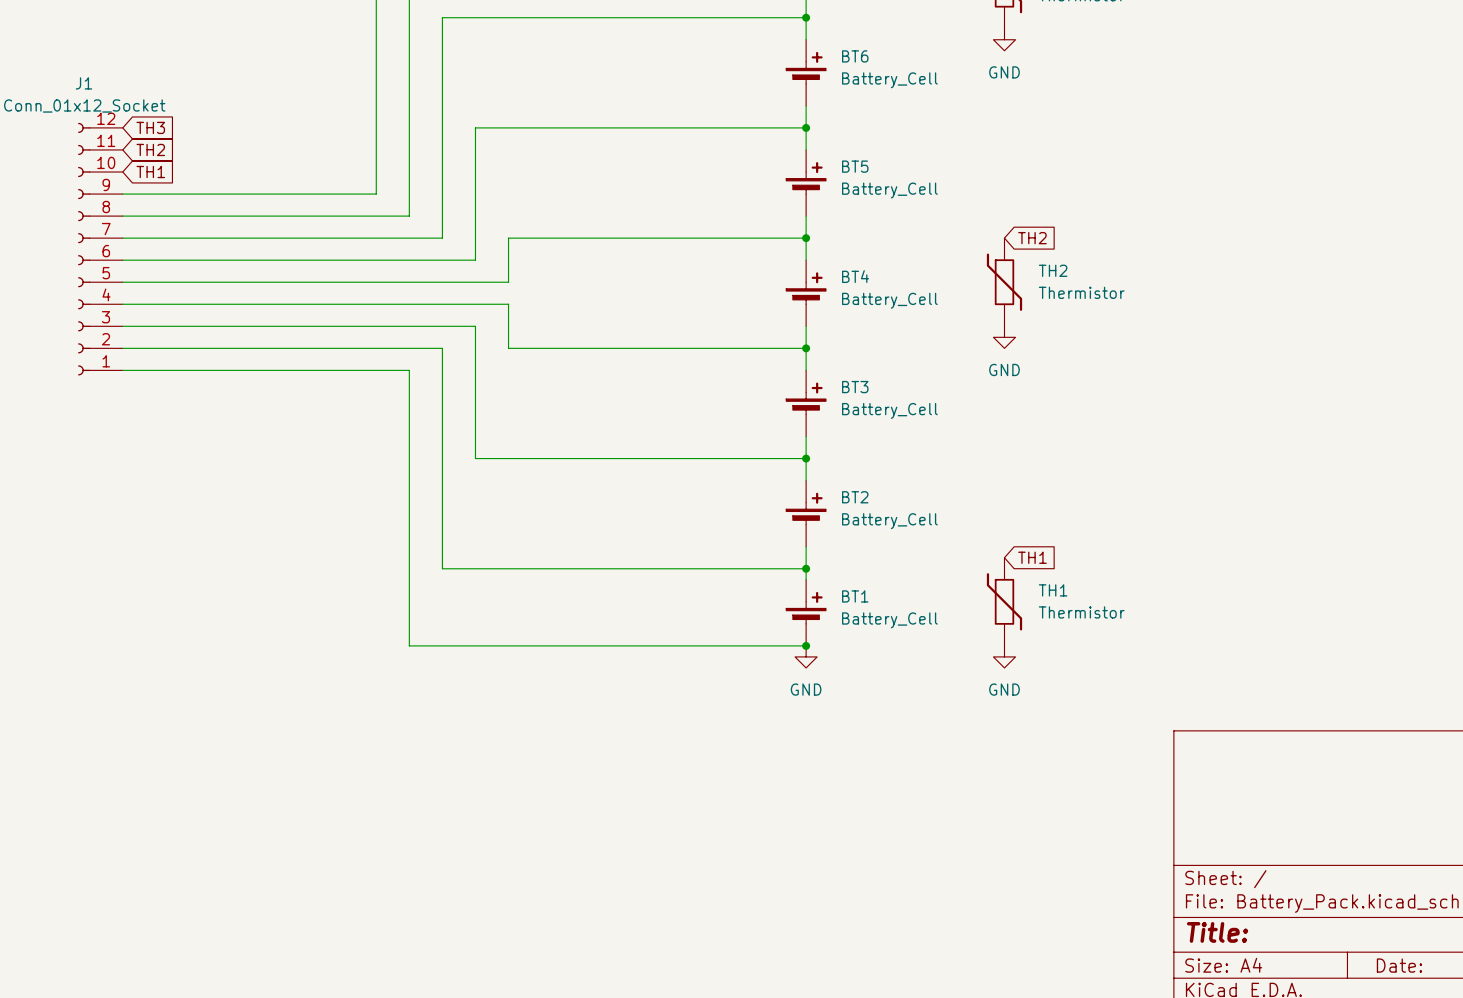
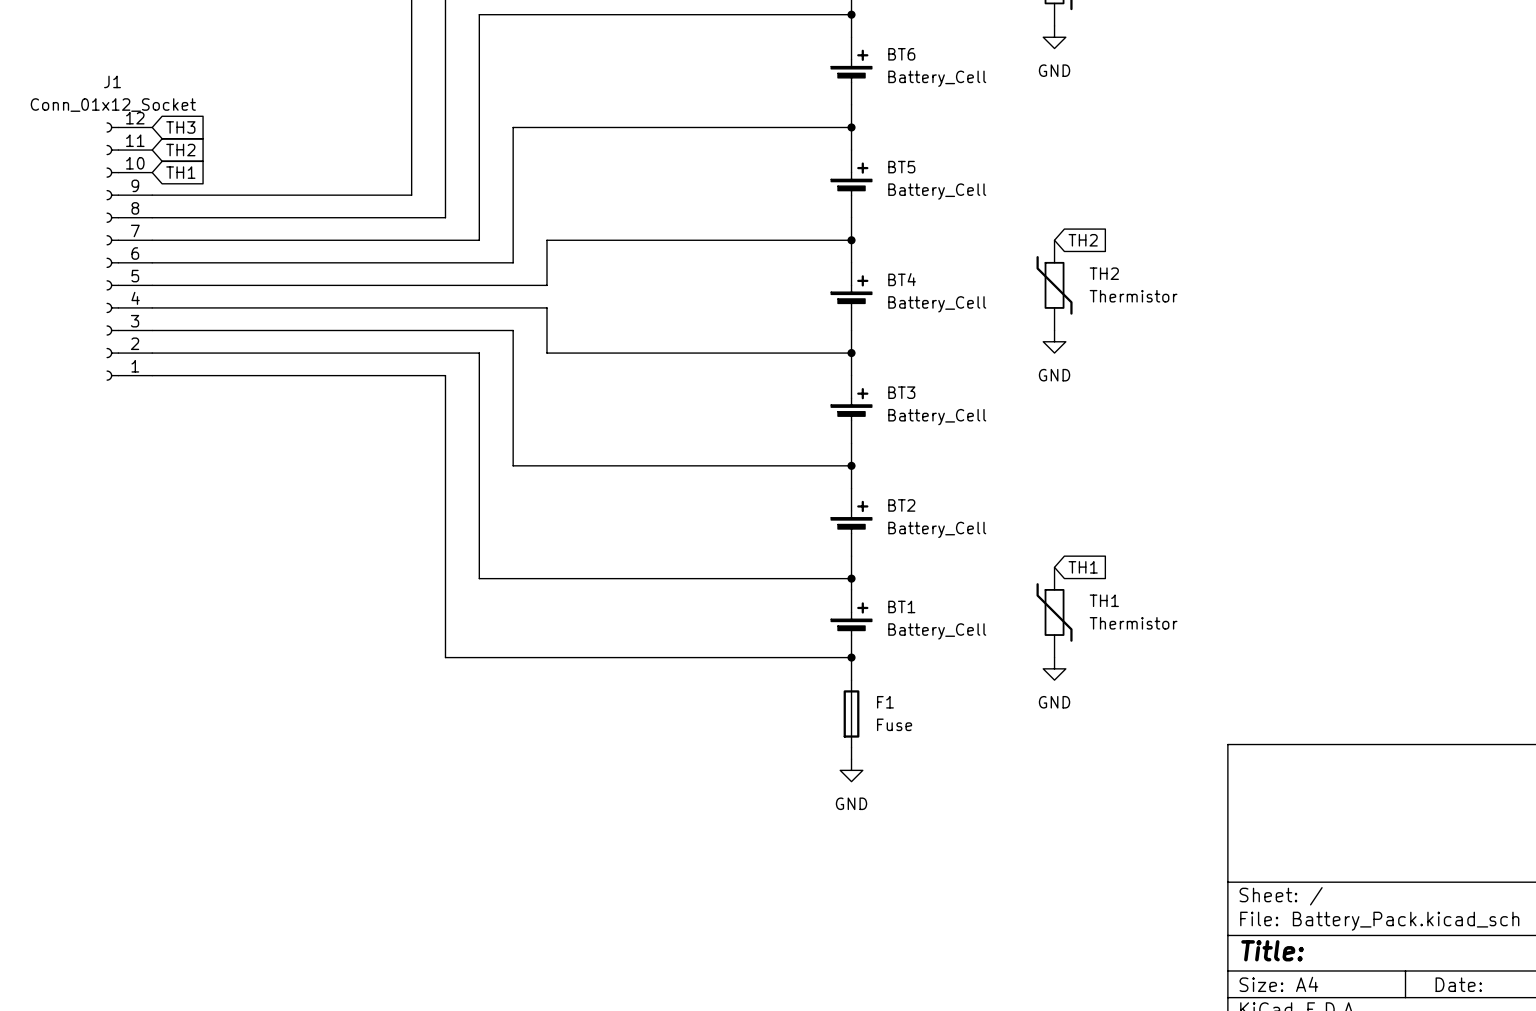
power symbol position: GND (806, 656) -> GND (851, 770)
F1: none -> Fuse (851, 713)
wire: none -> (851, 747) (851, 759)

